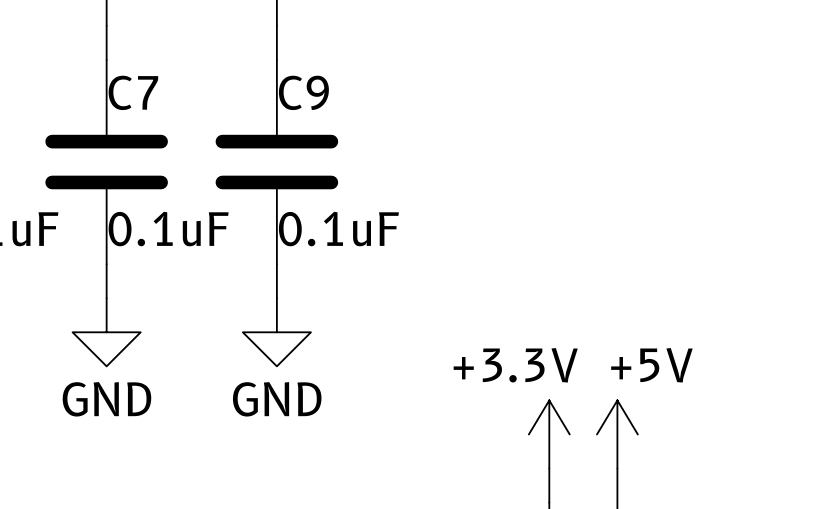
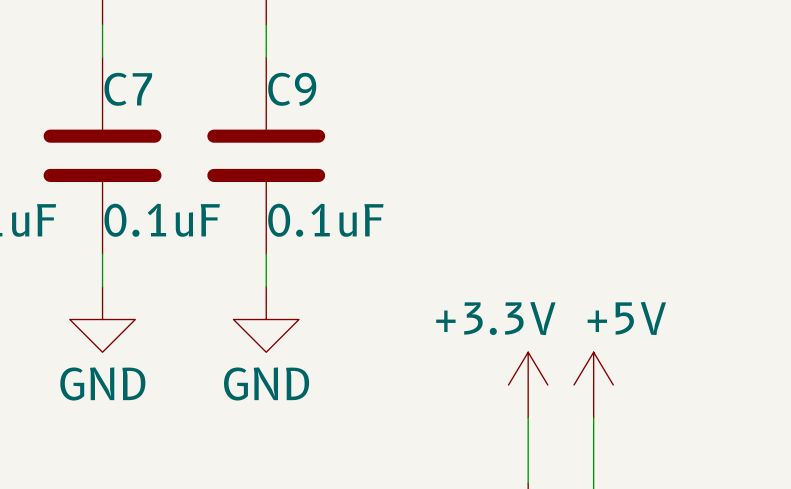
power symbol position: +3.3V (549, 434) -> +3.3V (528, 384)
power symbol position: +5V (617, 434) -> +5V (593, 384)

